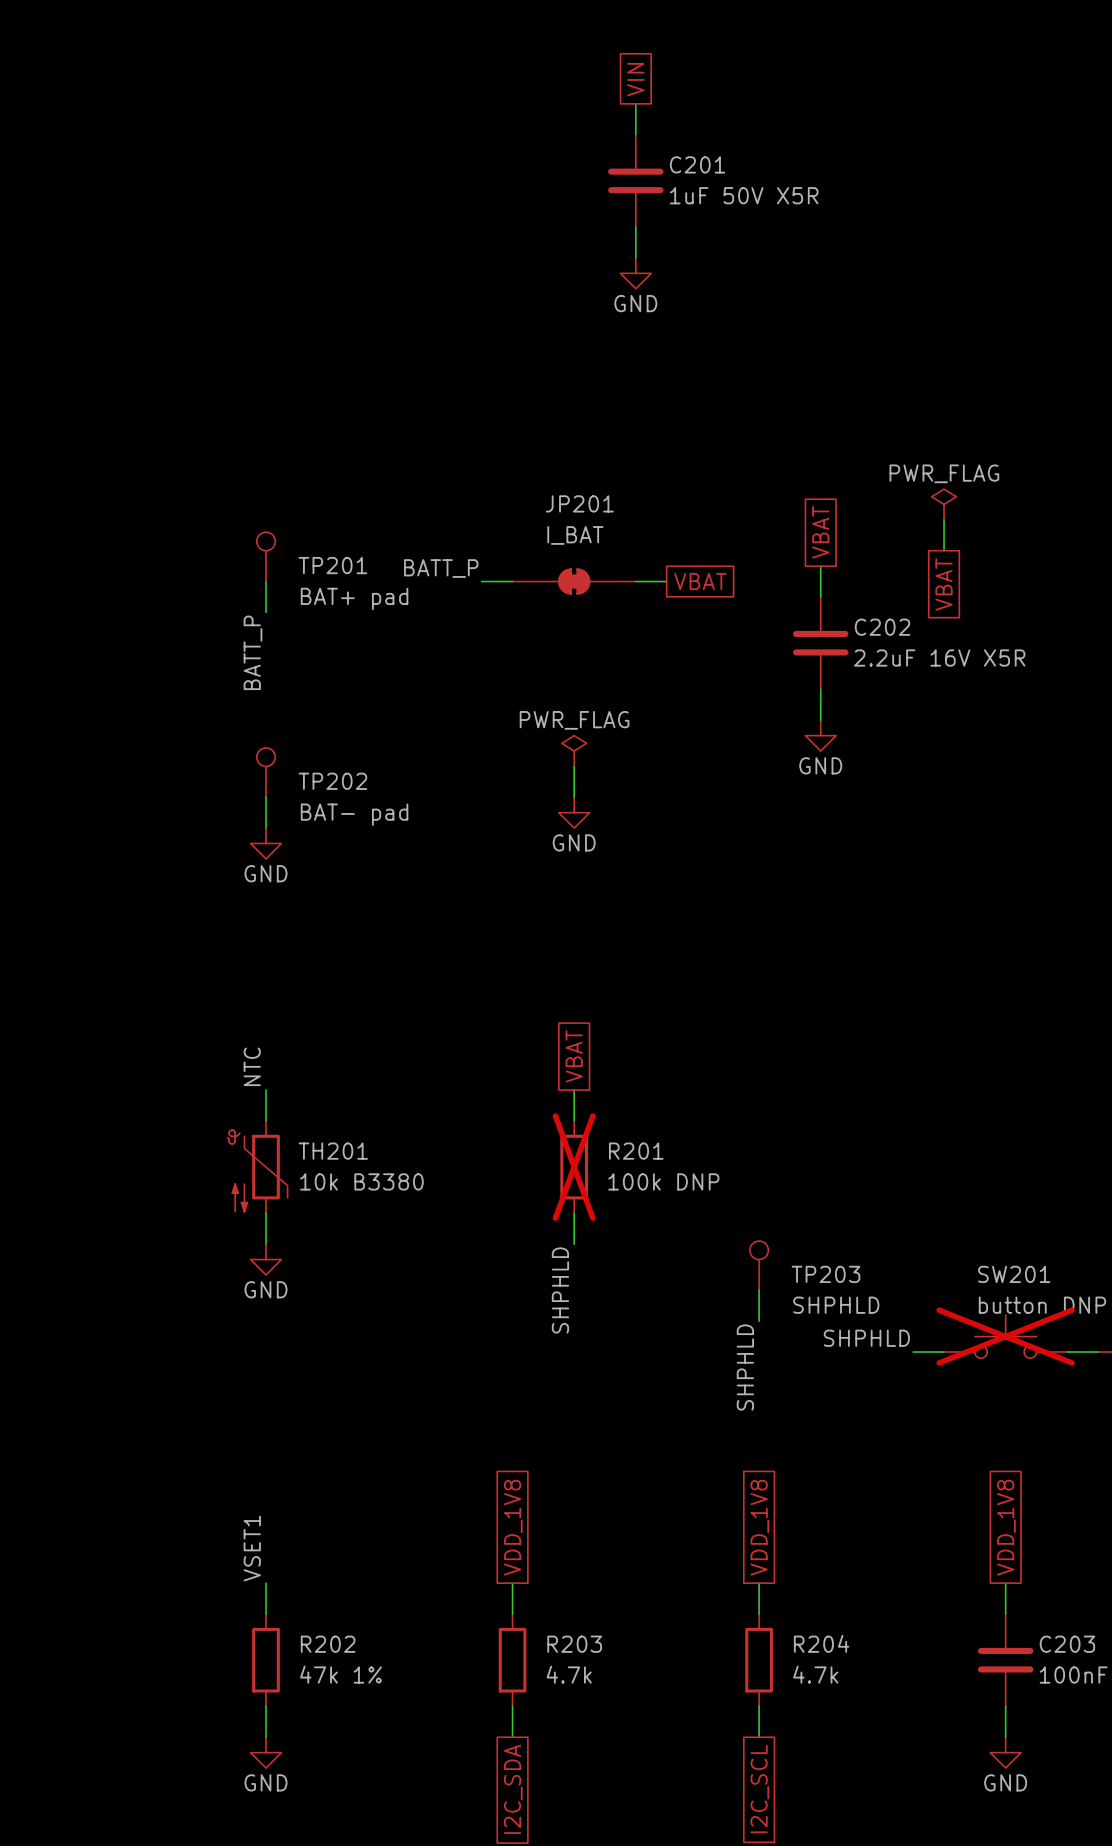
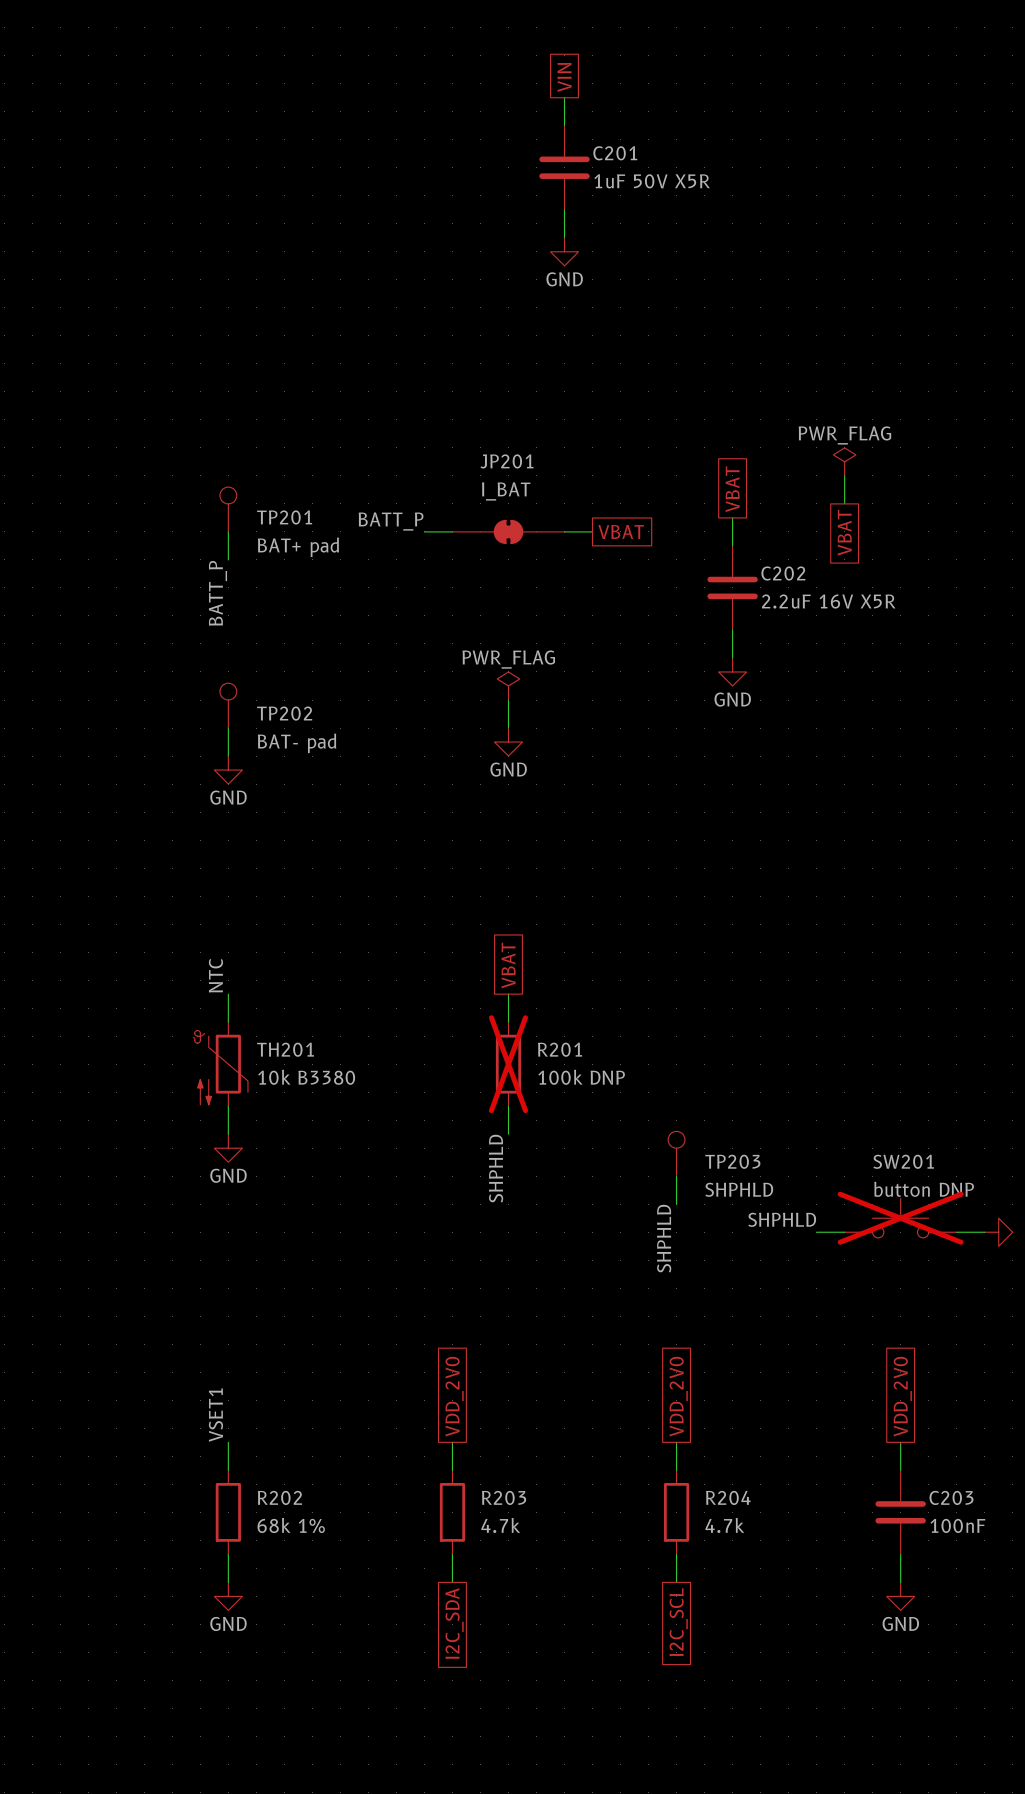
global label: VDD_1V8 (513, 1527) -> VDD_2V0 (454, 1396)
global label: VDD_1V8 (759, 1527) -> VDD_2V0 (678, 1396)
global label: VDD_1V8 (1006, 1527) -> VDD_2V0 (902, 1396)
R202 value: 47k 1% (340, 1674) -> 68k 1% (291, 1525)

